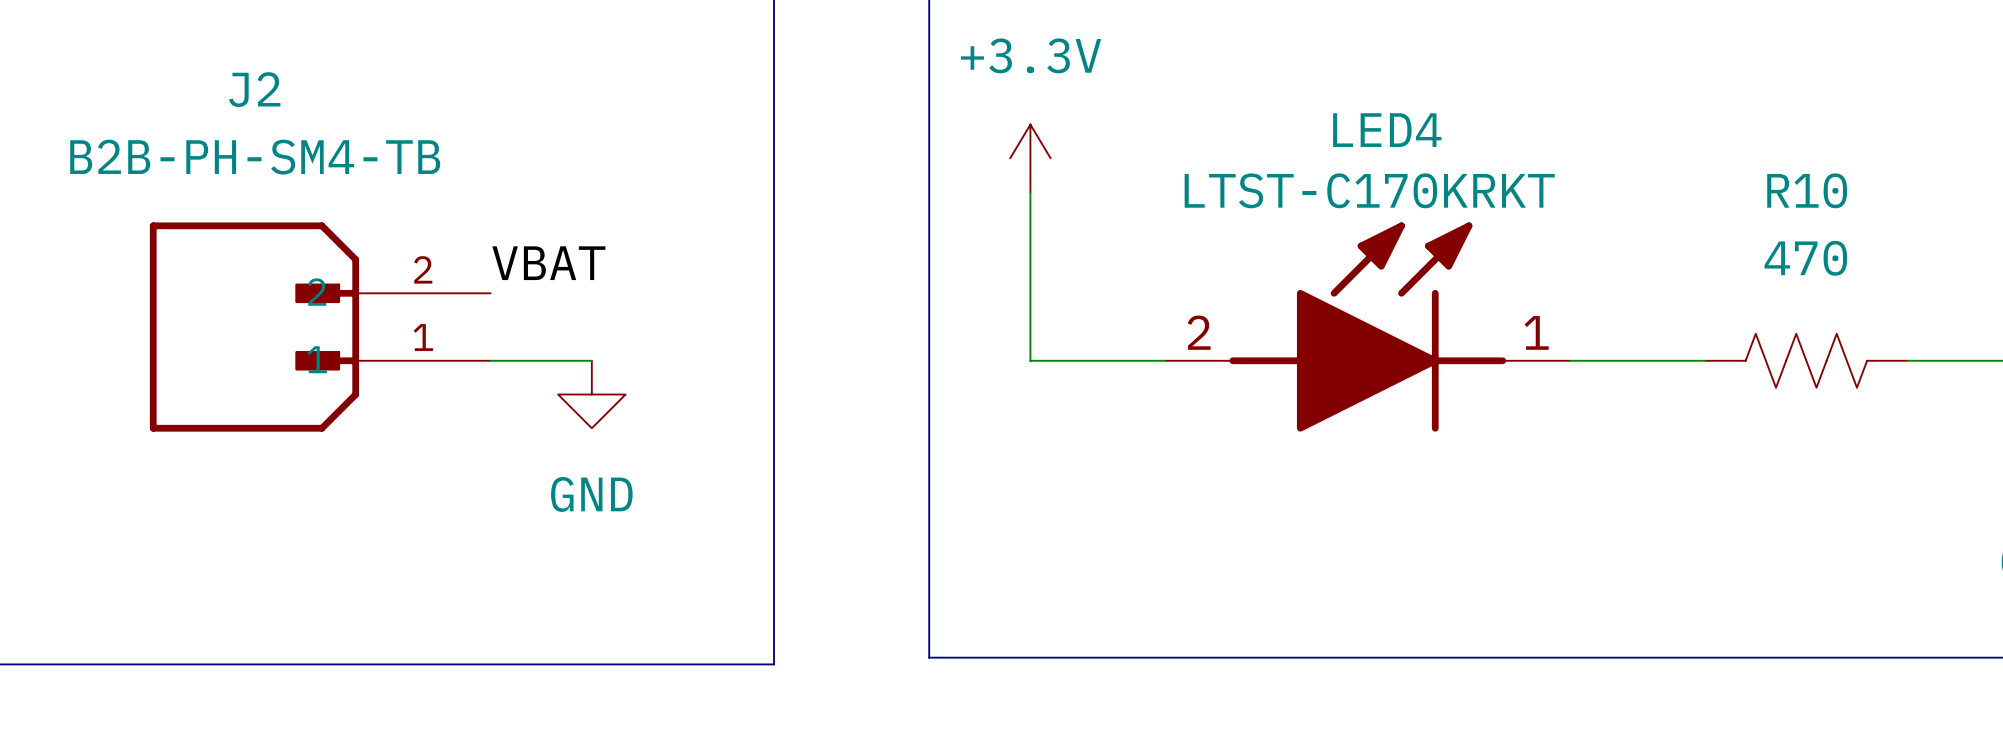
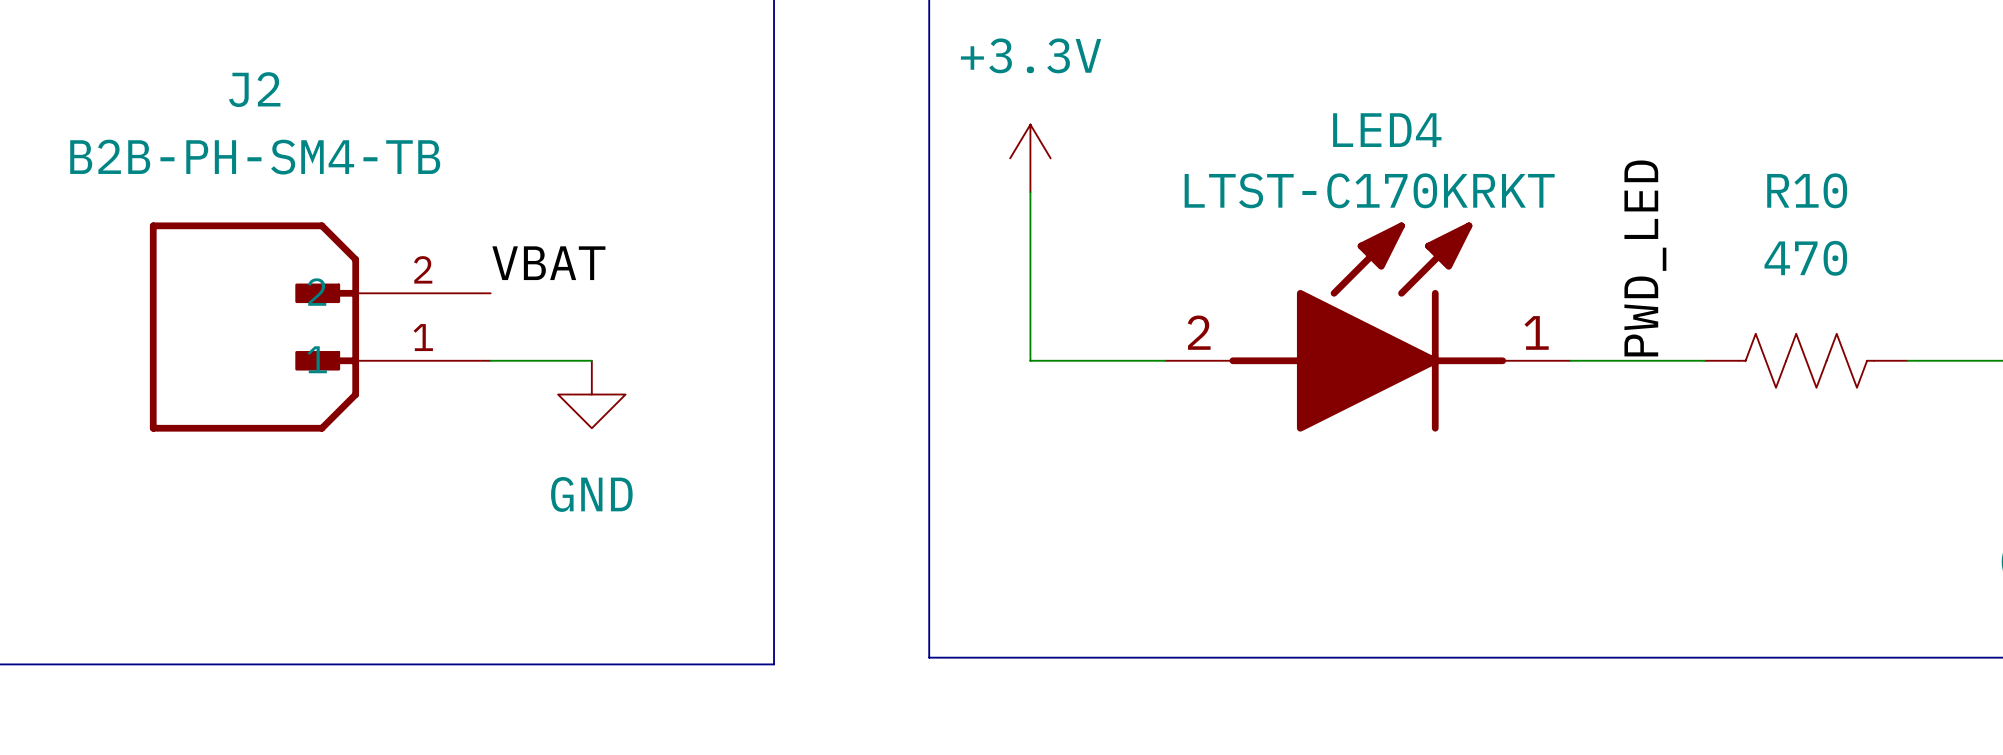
label: none -> PWD_LED (1645, 258)

